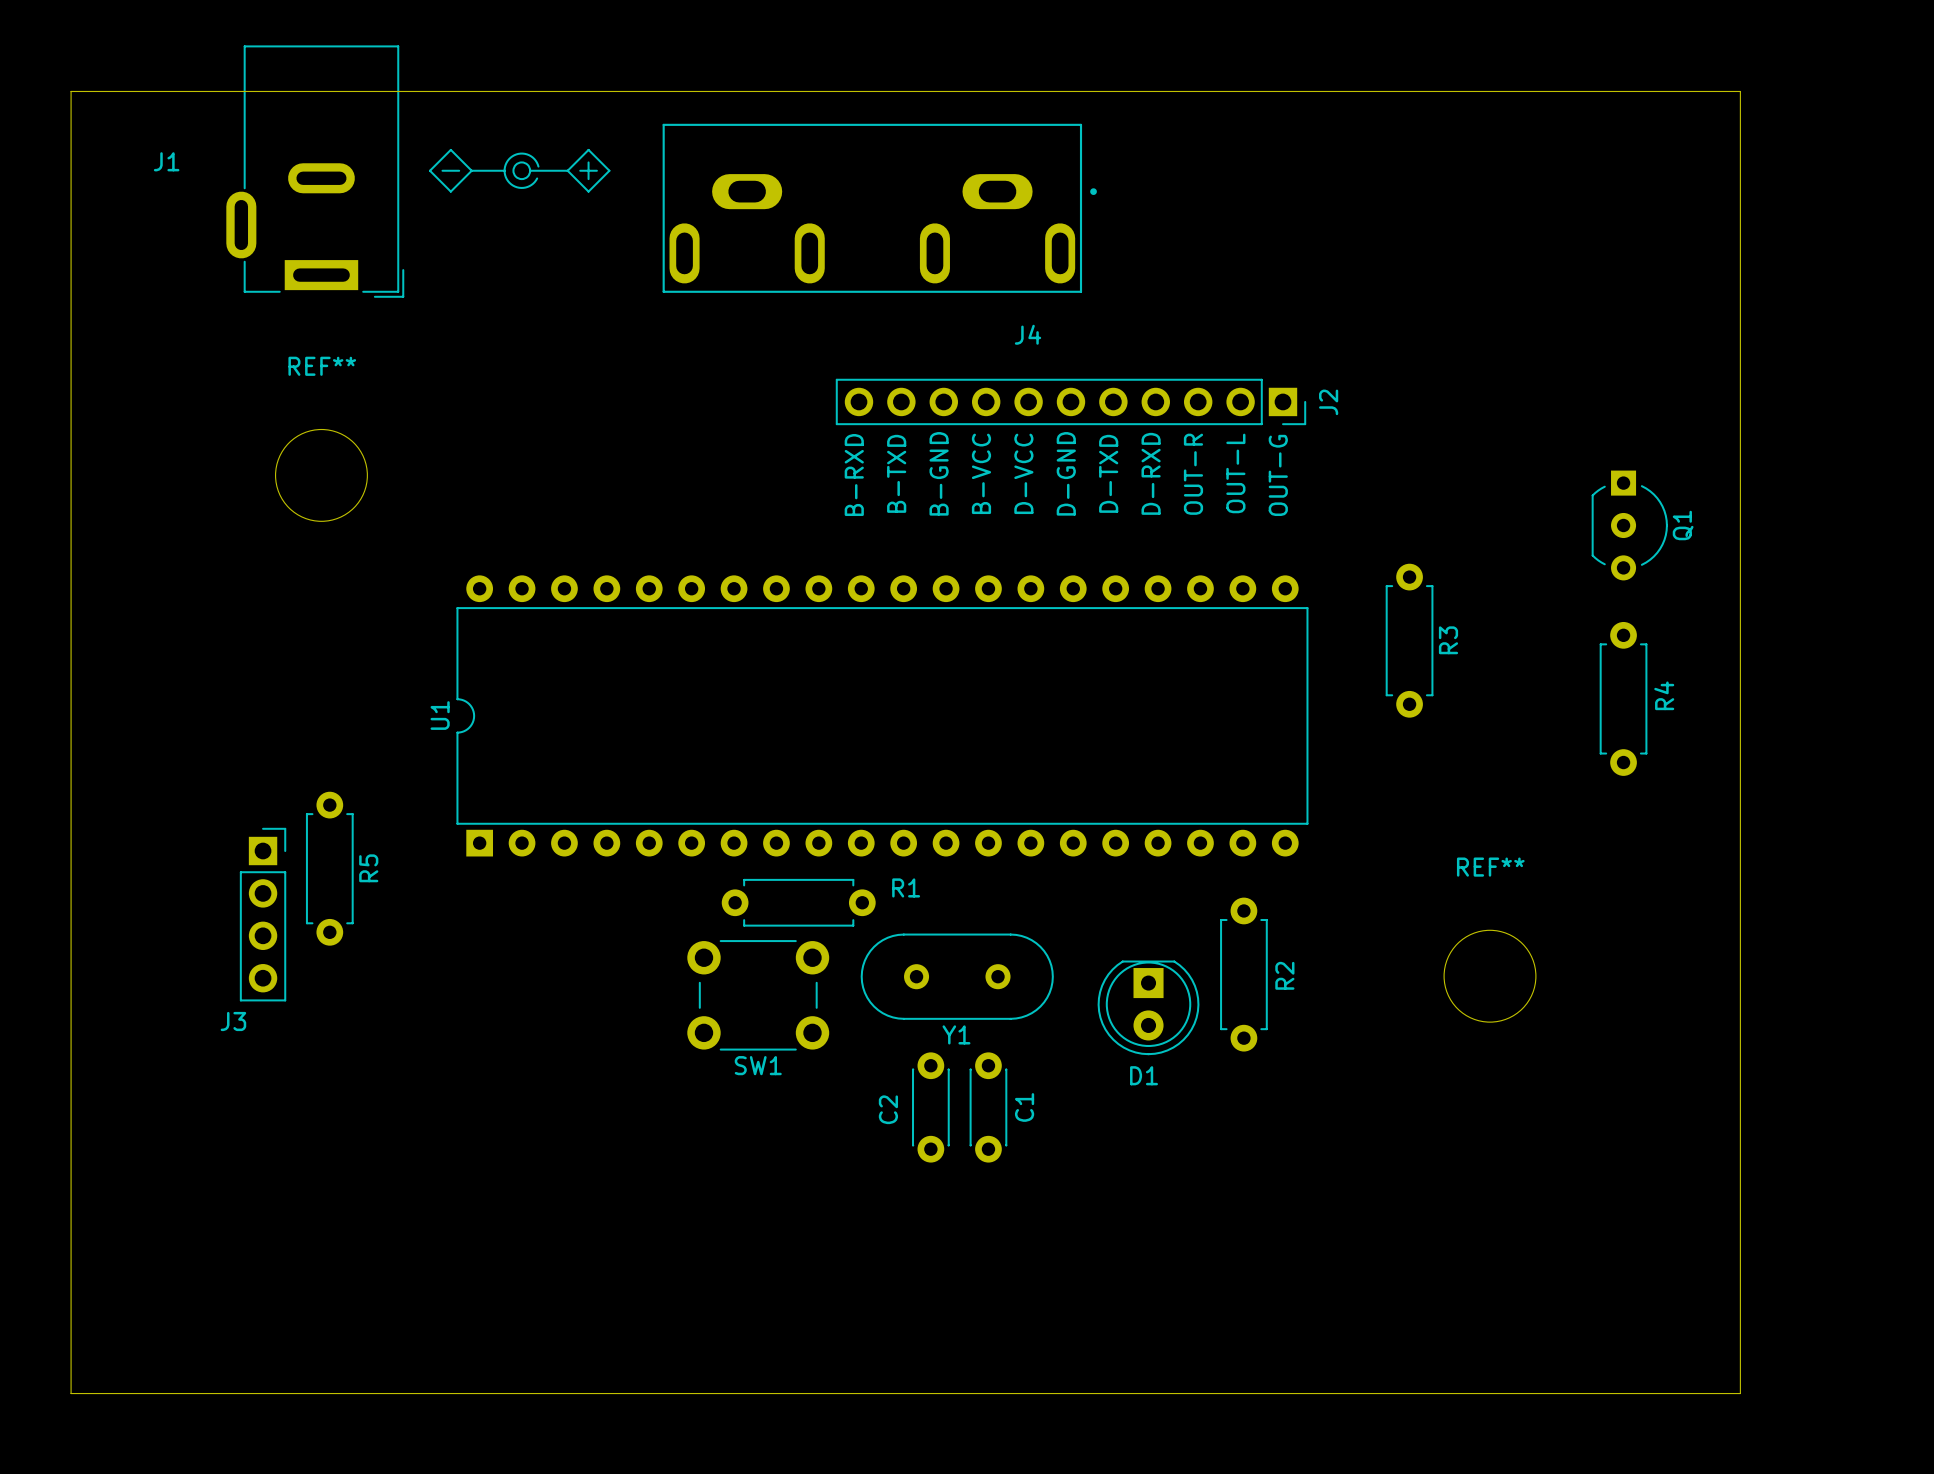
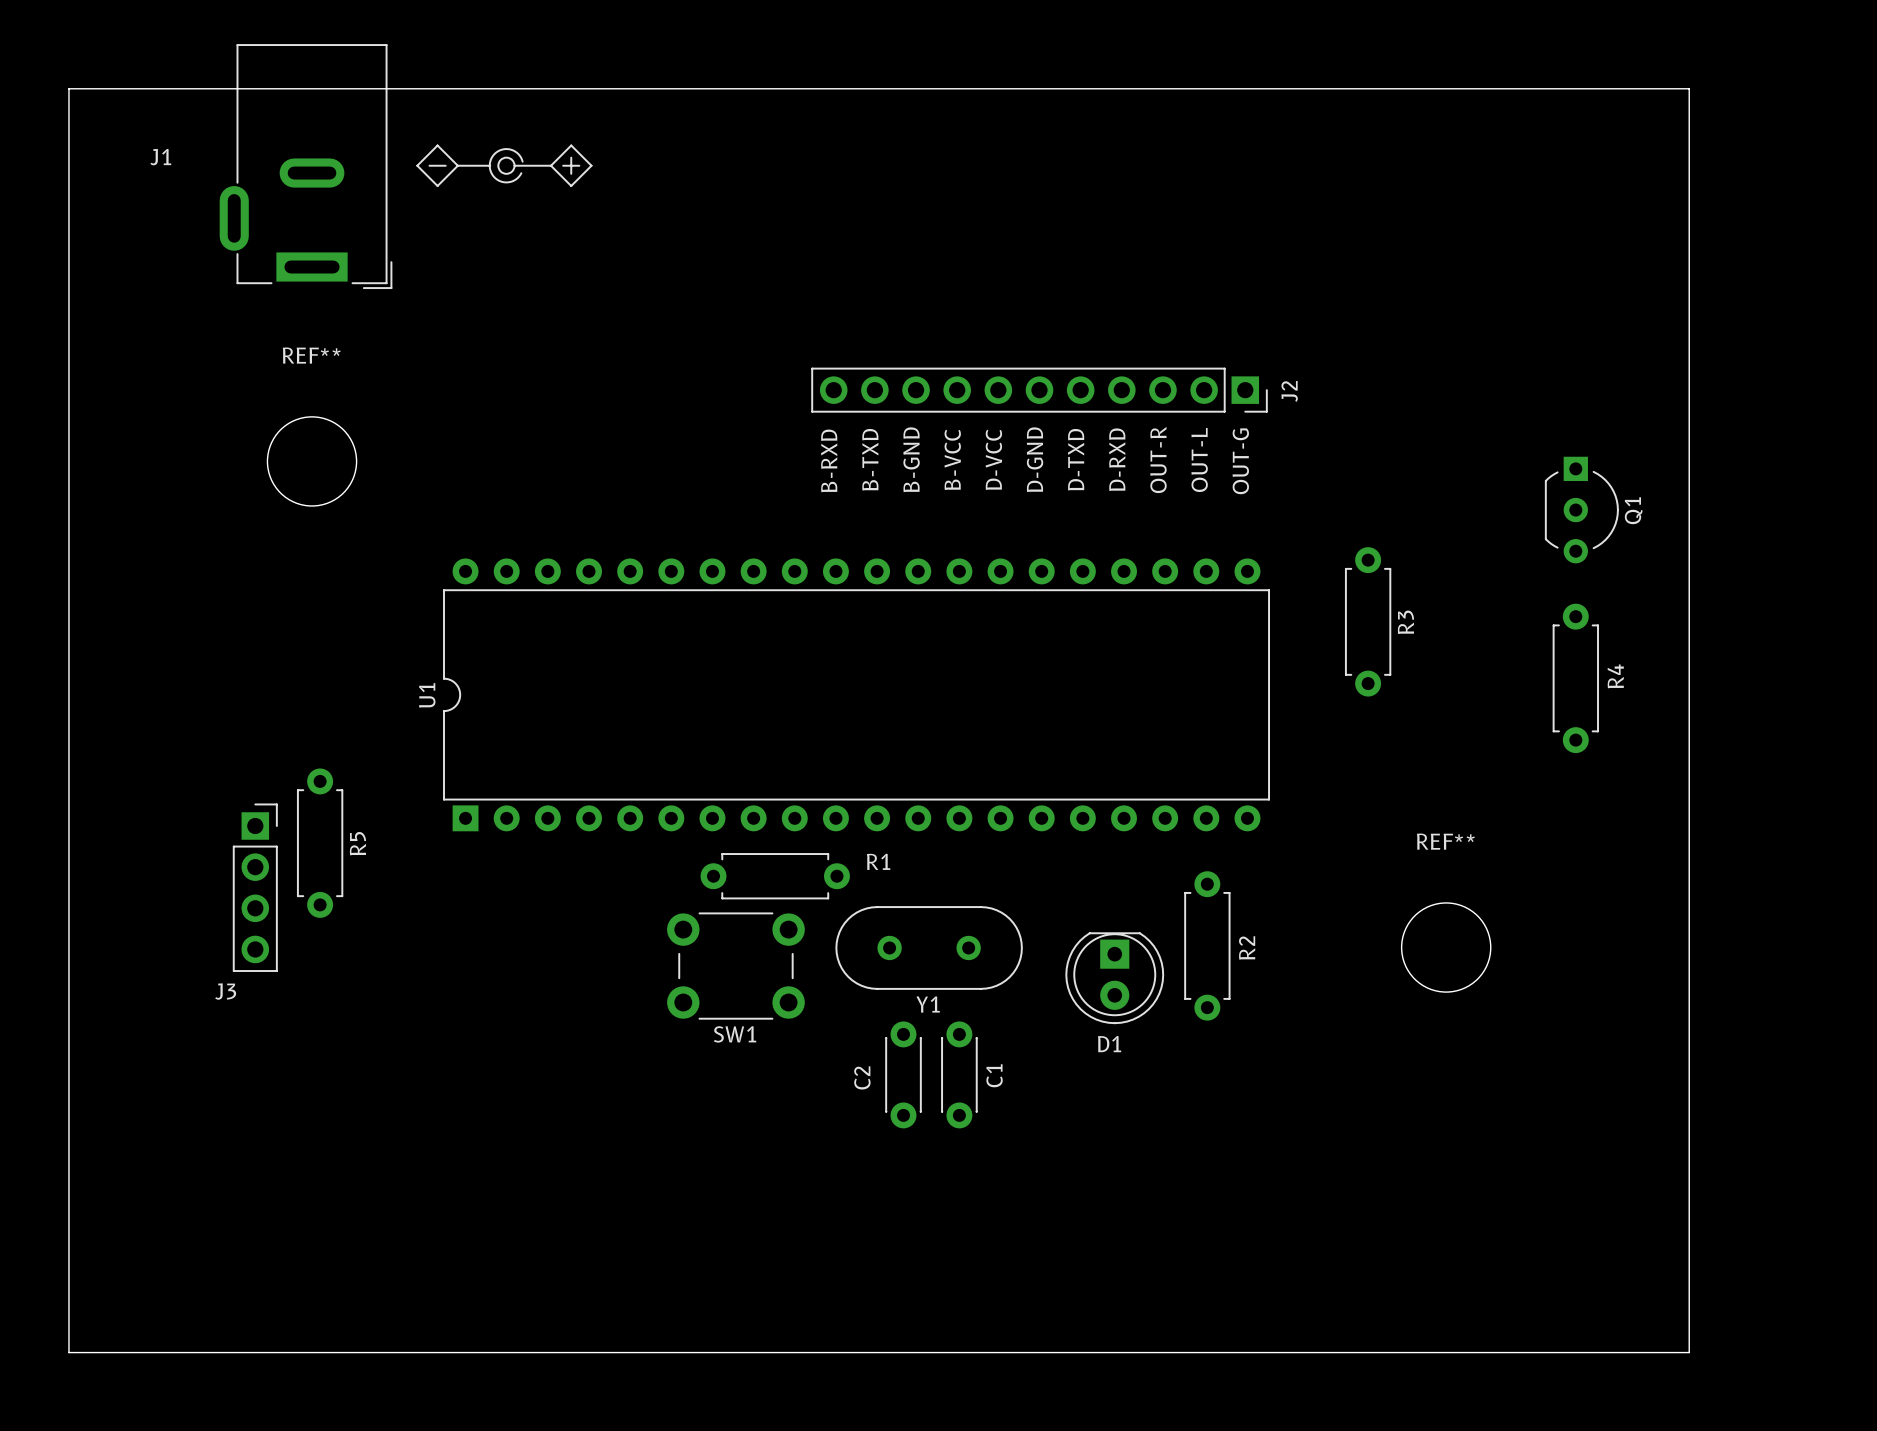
J4: (879, 208) -> none

